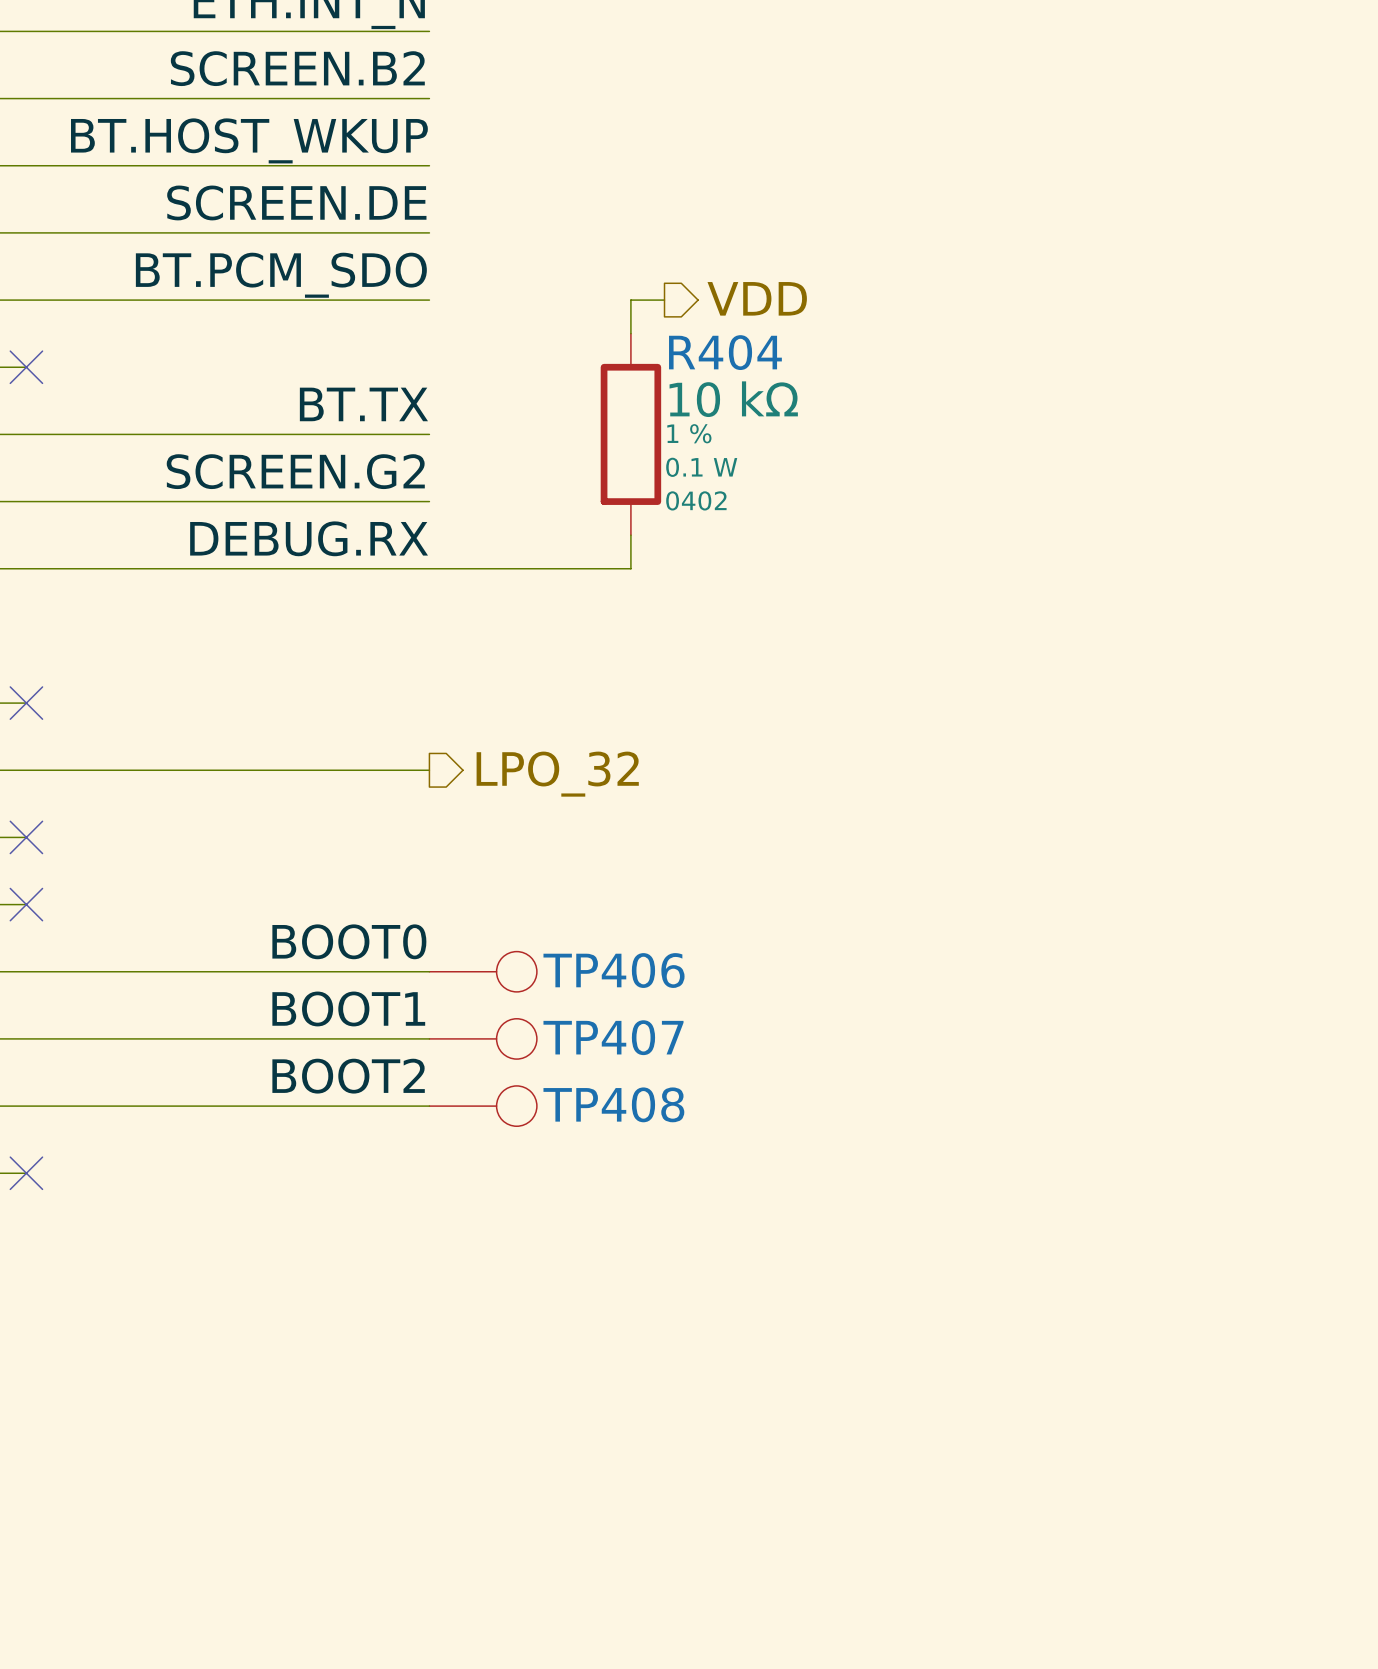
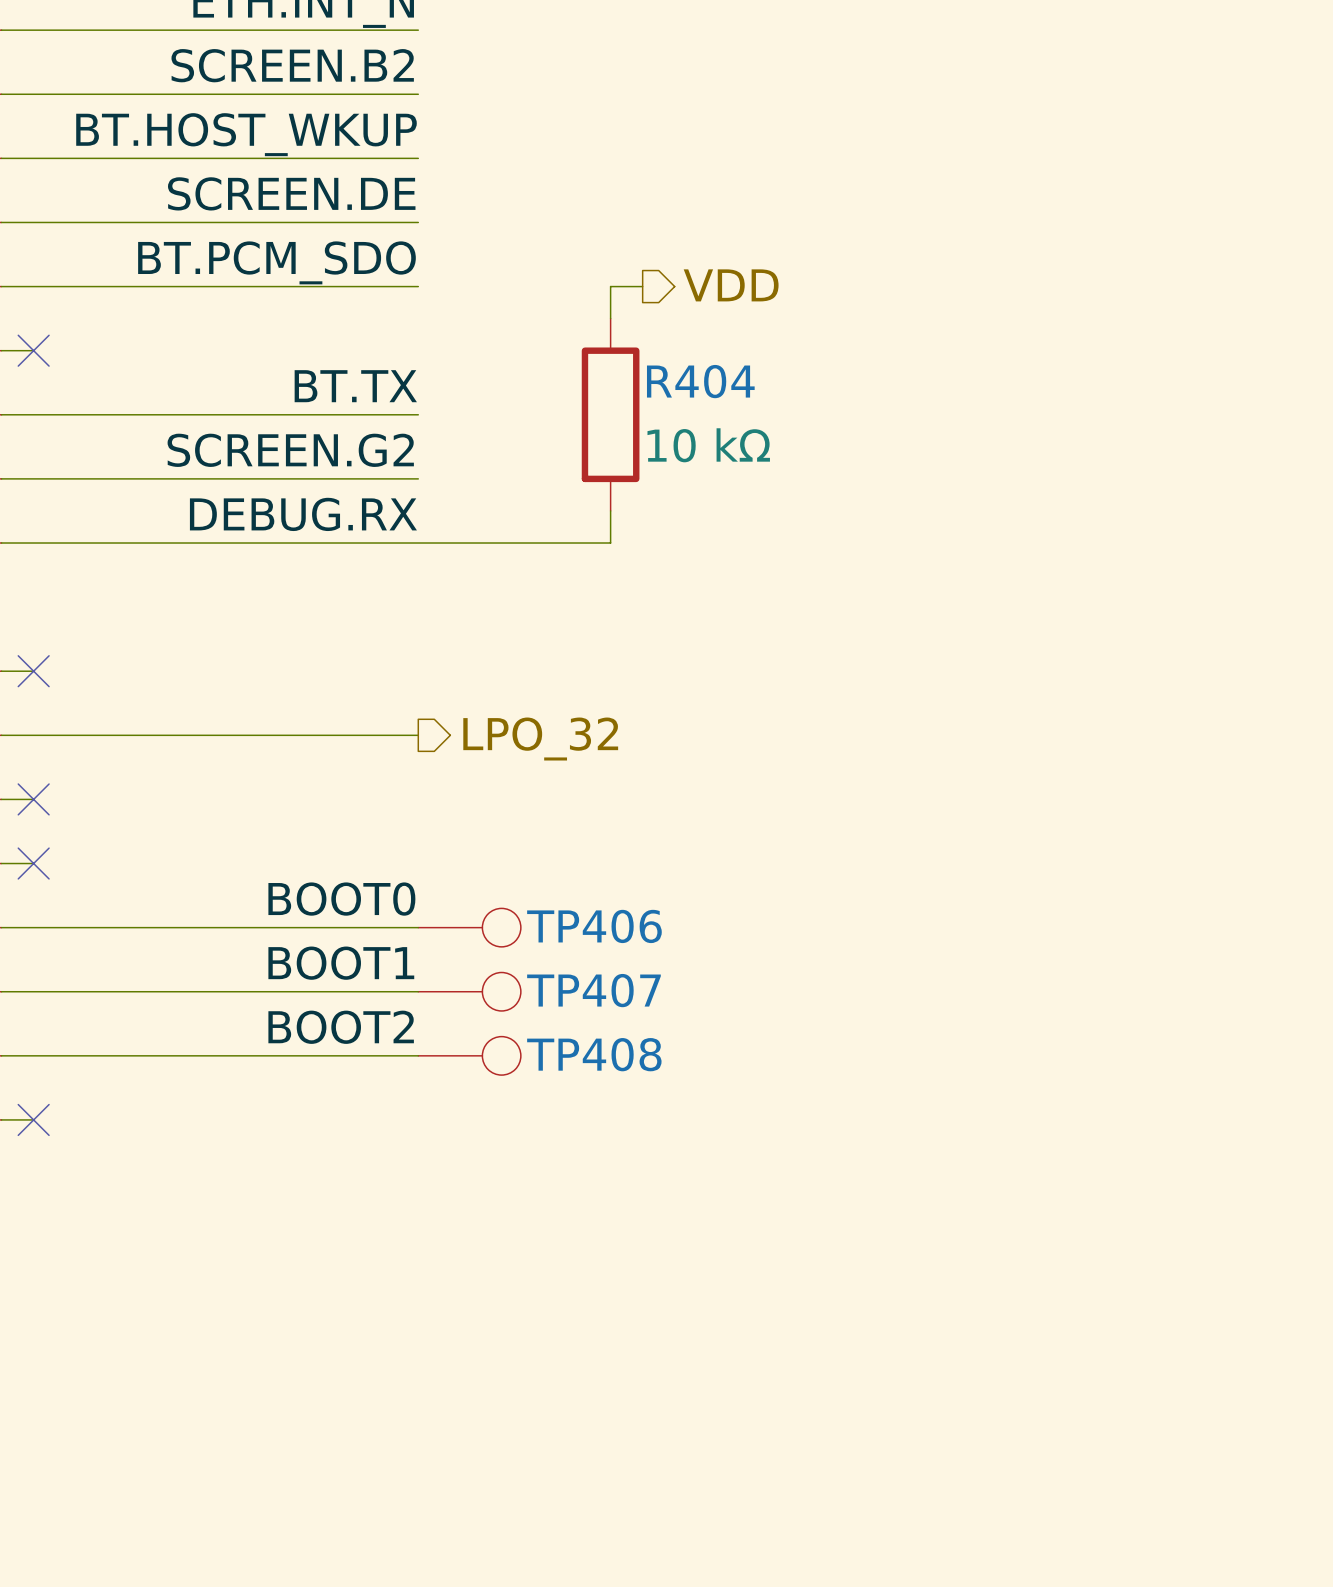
R404 name position: R404 (725, 352) -> R404 (700, 381)
R404 value position: 10 kΩ (733, 399) -> 10 kΩ (708, 445)
R404 text: 1 % (689, 433) -> none
R404 text: 0.1 W (701, 467) -> none
R404 text: 0402 (696, 500) -> none

